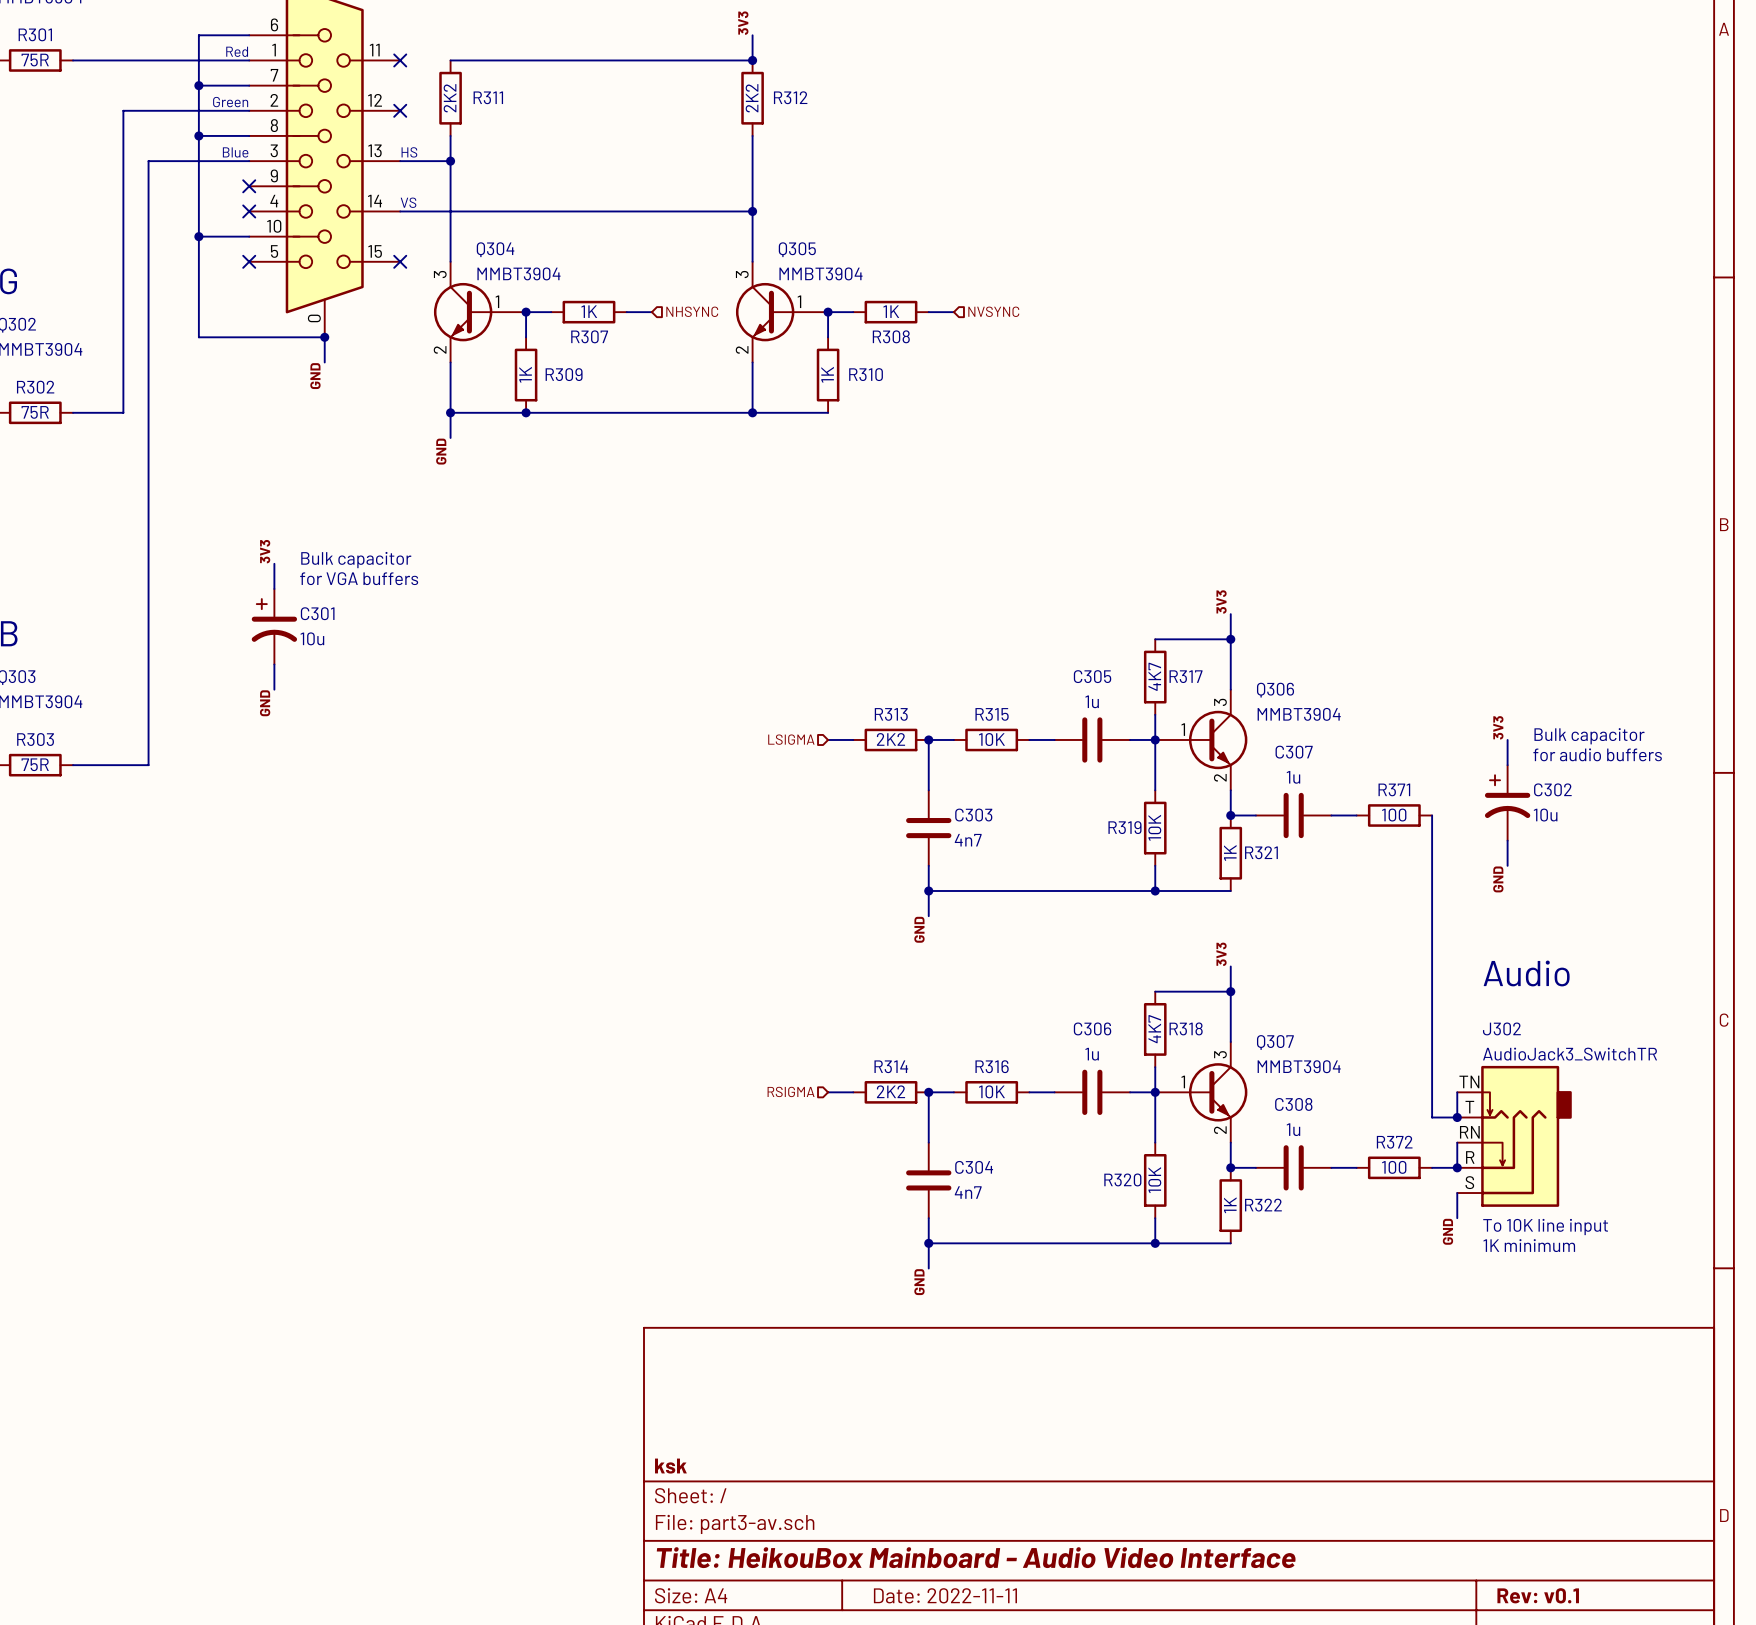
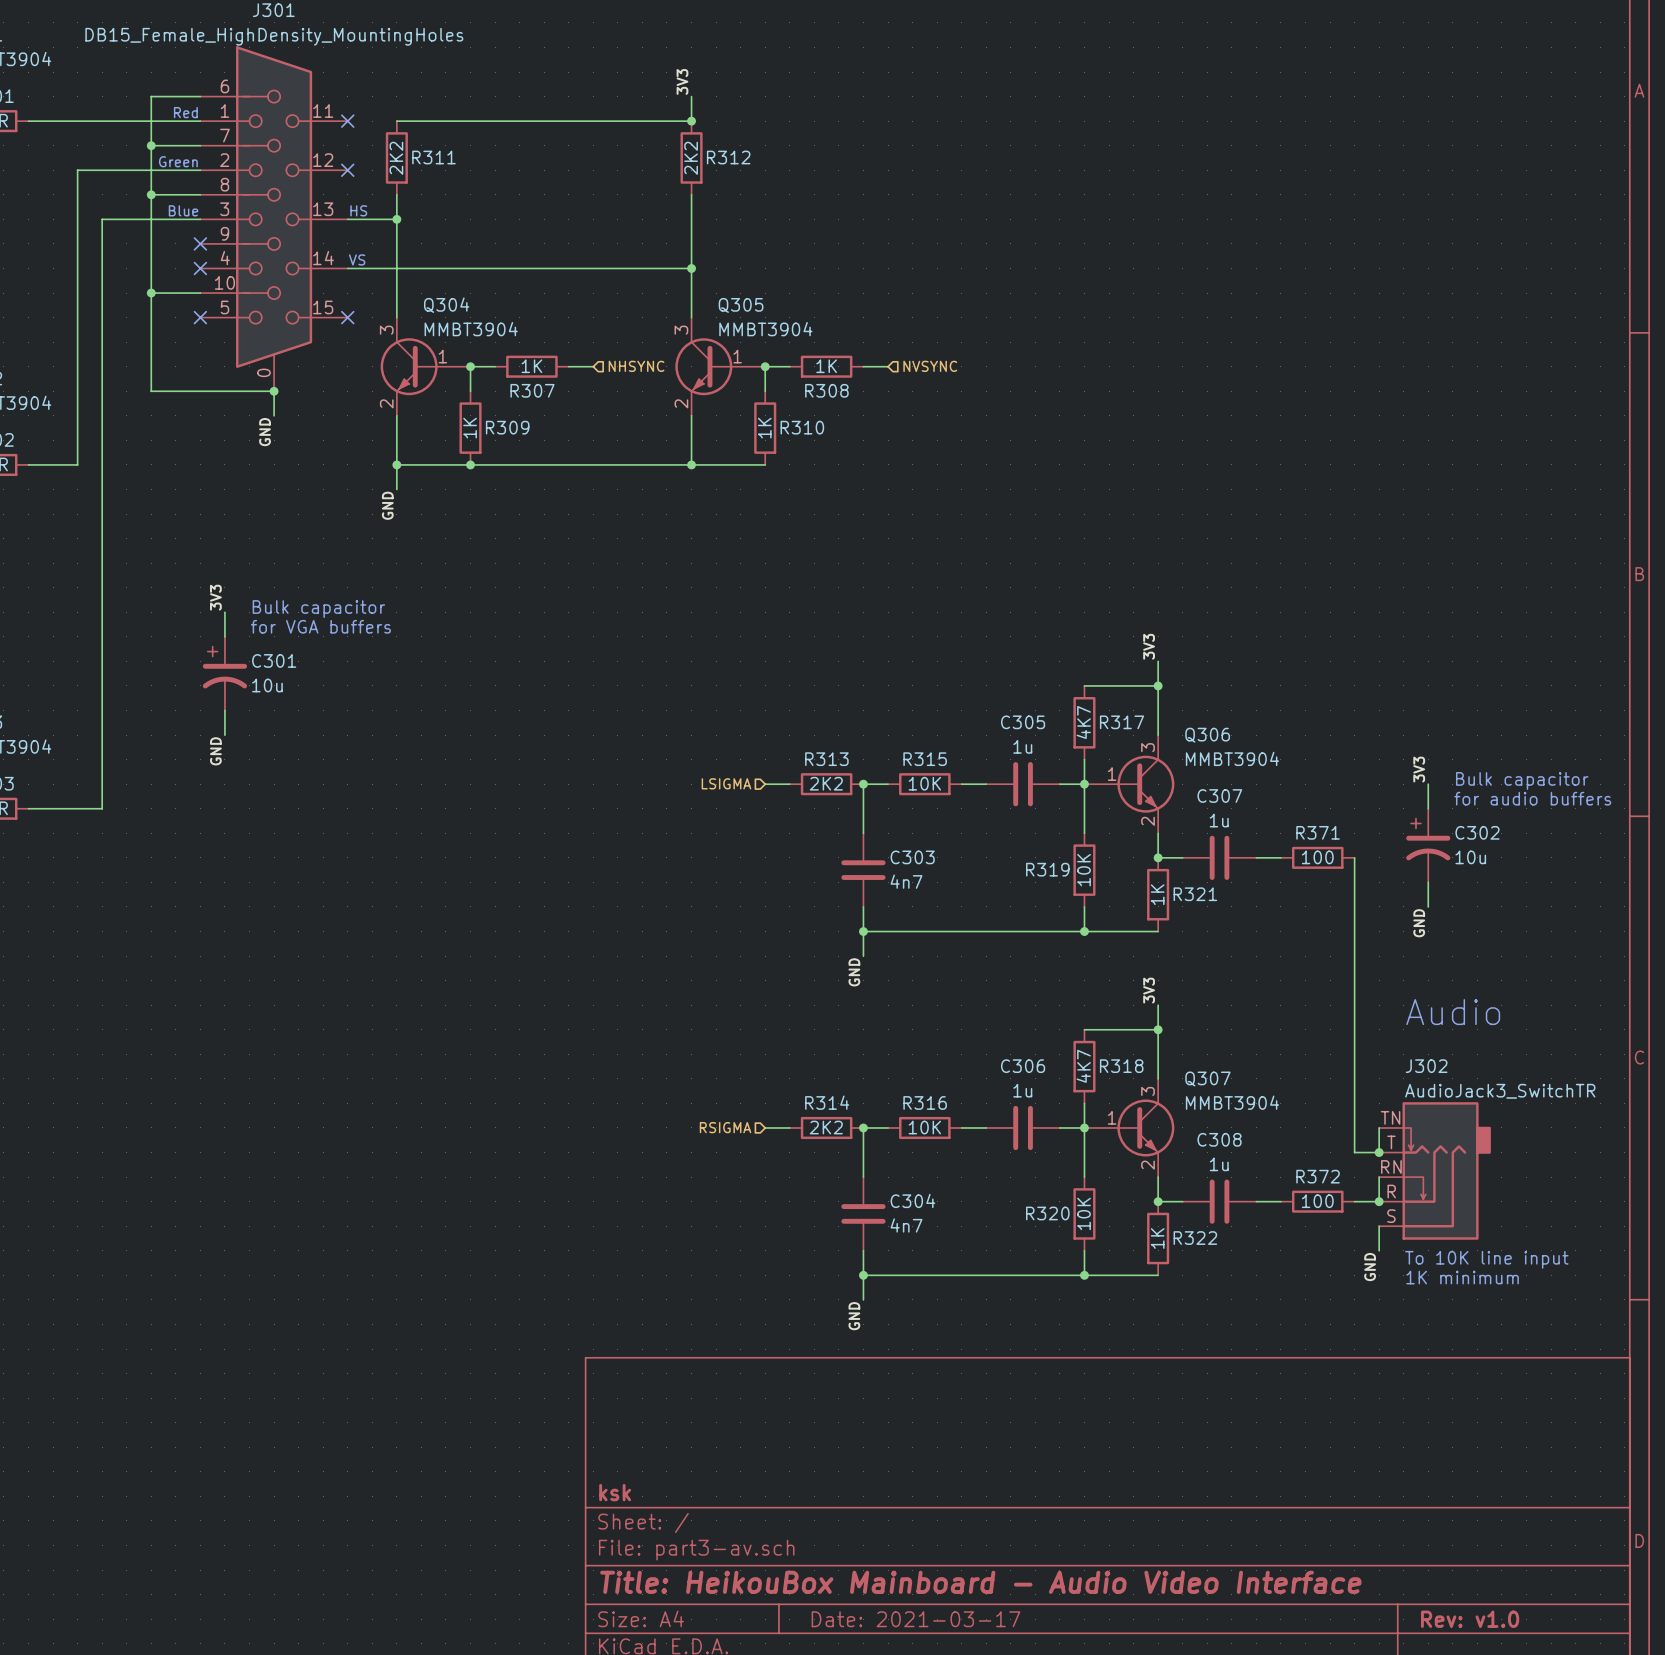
title block: Date: 2022-11-11 (945, 1595) -> Date: 2021-03-17 (915, 1619)
title block: Rev: v0.1 (1538, 1595) -> Rev: v1.0 (1470, 1619)

